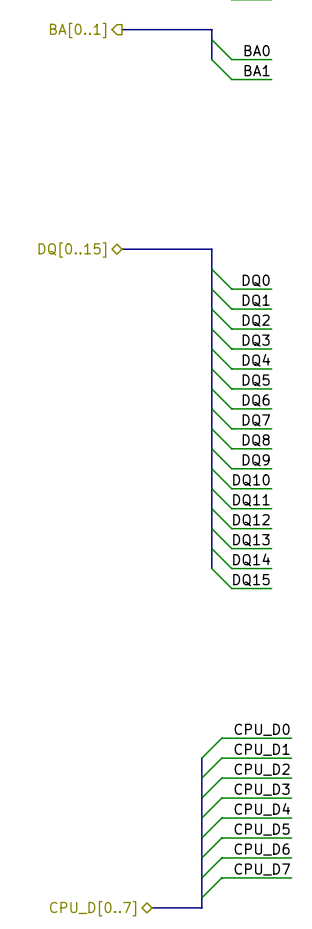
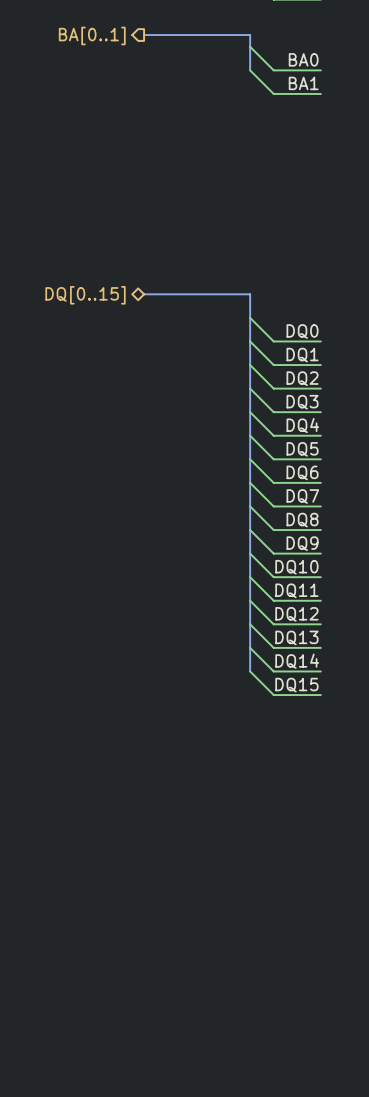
label: CPU_D0 (262, 729) -> none
wire: (291, 738) (221, 738) (201, 758) -> none
label: CPU_D1 (262, 749) -> none
bus: (201, 758) (201, 907) (151, 907) -> none
wire: (291, 758) (221, 758) (201, 778) -> none
label: CPU_D2 (262, 769) -> none
wire: (291, 778) (221, 778) (201, 798) -> none
label: CPU_D3 (262, 789) -> none
wire: (291, 798) (221, 798) (201, 818) -> none
label: CPU_D4 (262, 809) -> none
wire: (291, 818) (221, 818) (201, 838) -> none
label: CPU_D5 (262, 829) -> none
wire: (291, 838) (221, 838) (201, 857) -> none
label: CPU_D6 (262, 849) -> none
wire: (291, 857) (221, 857) (201, 877) -> none
label: CPU_D7 (262, 869) -> none
wire: (291, 877) (221, 877) (201, 897) -> none
hierarchical label: CPU_D[0..7] (93, 908) -> none

